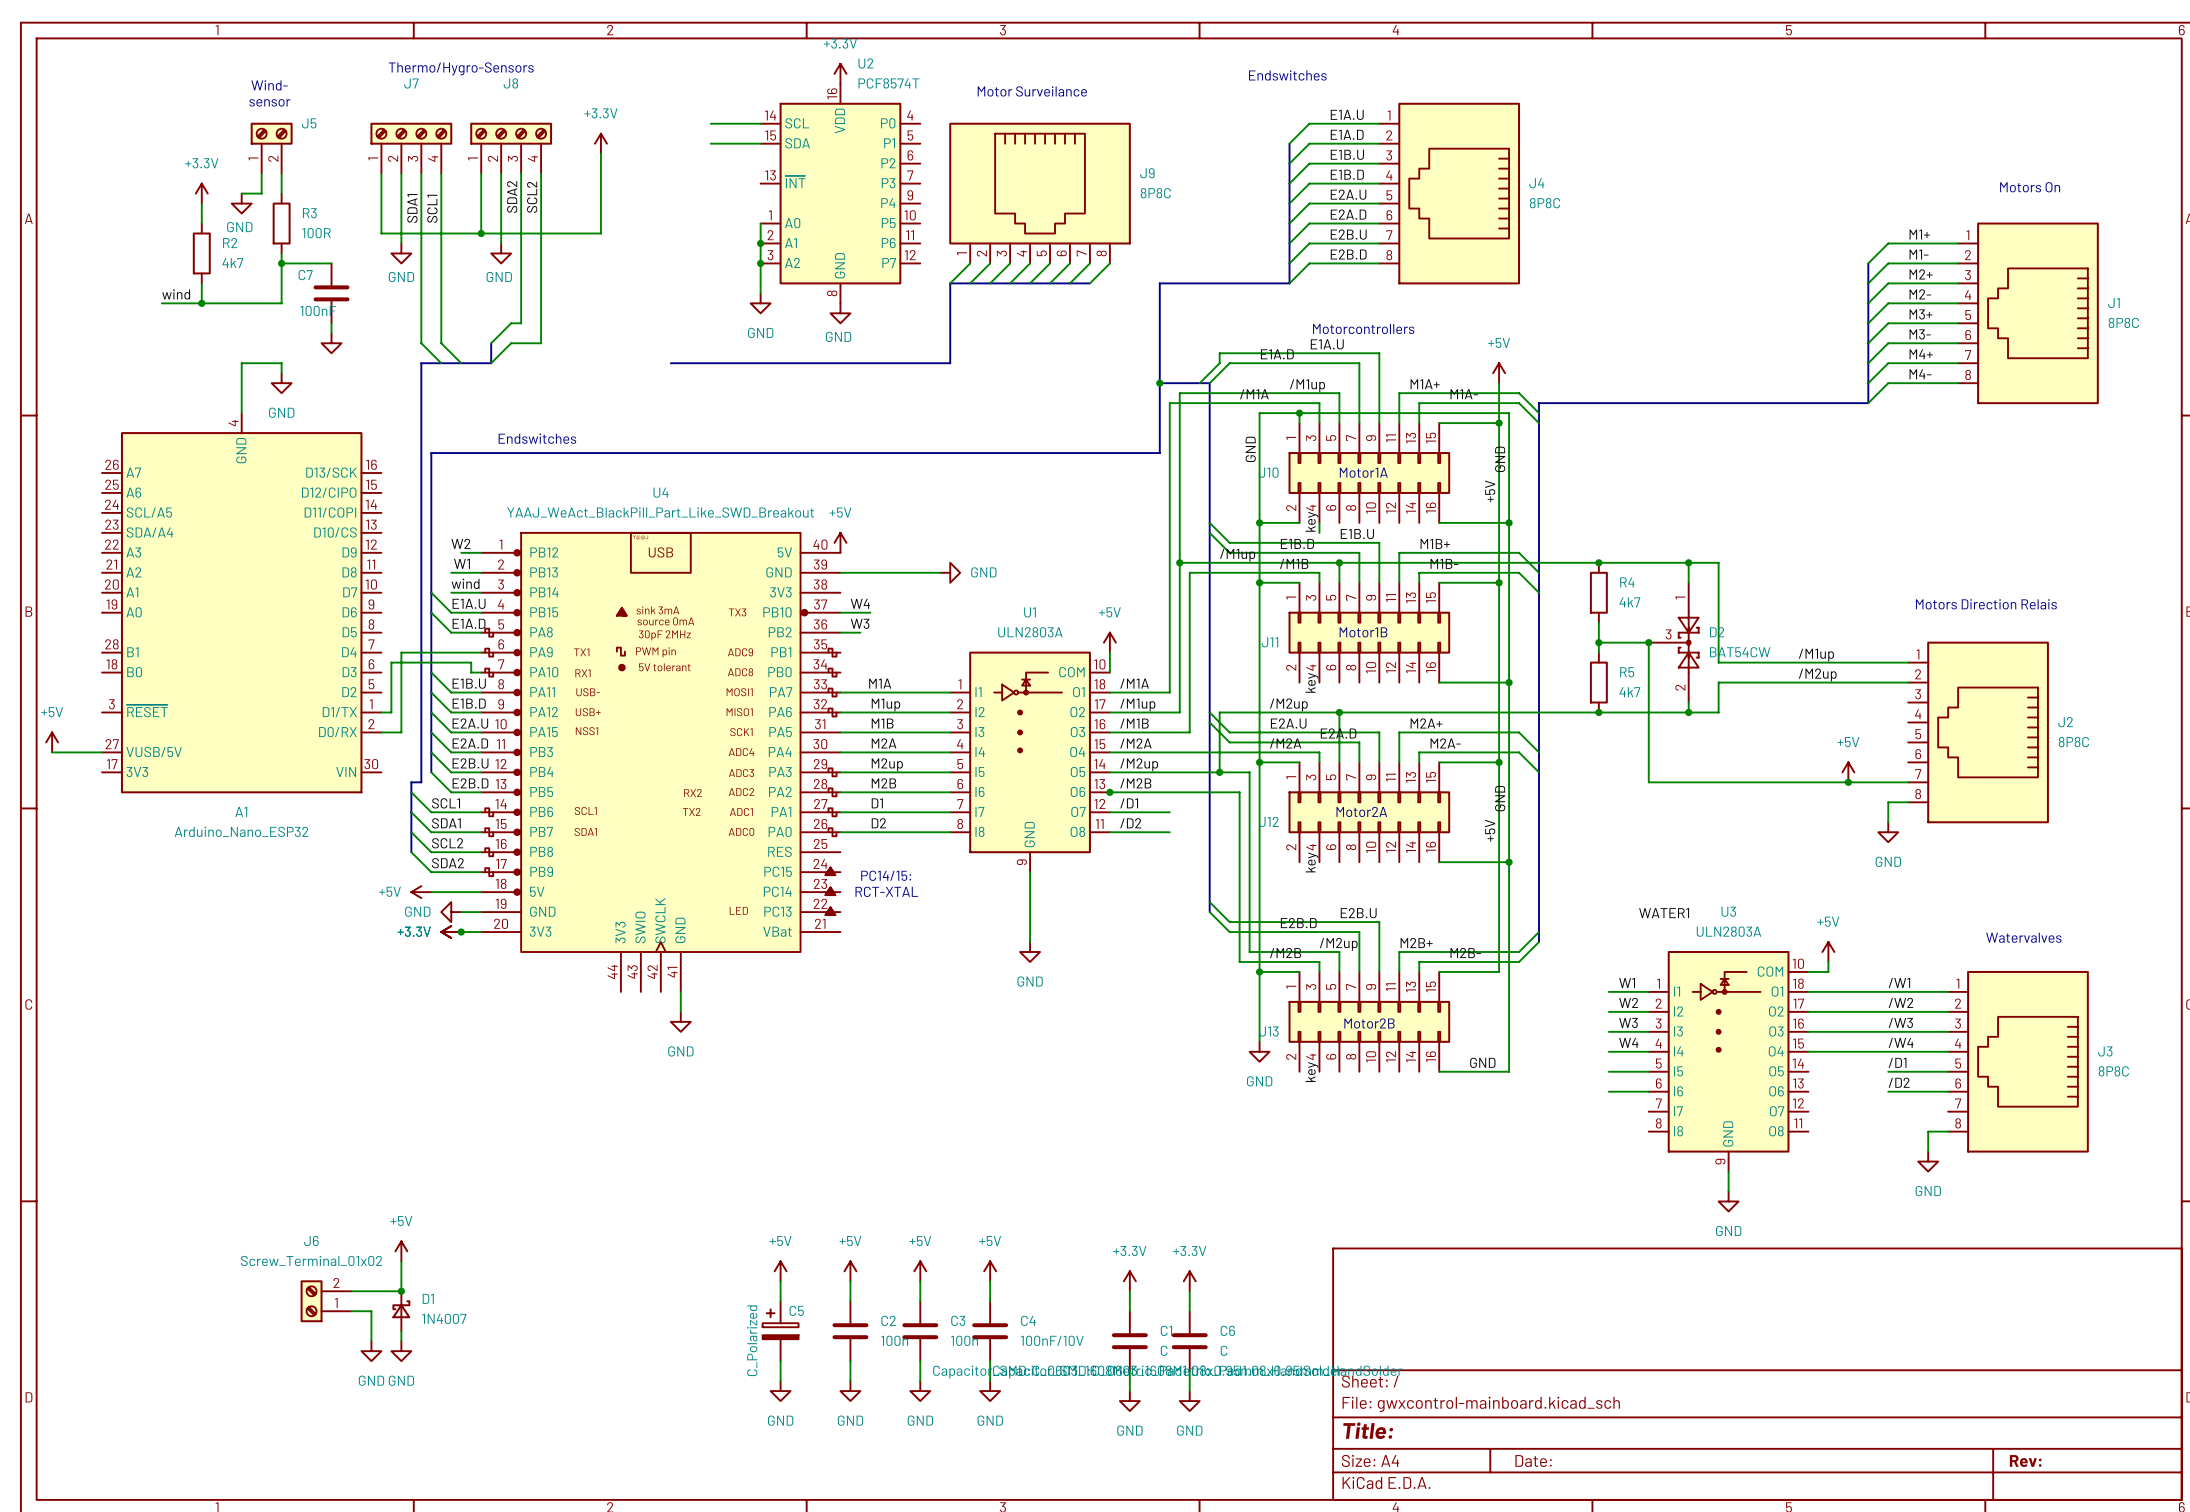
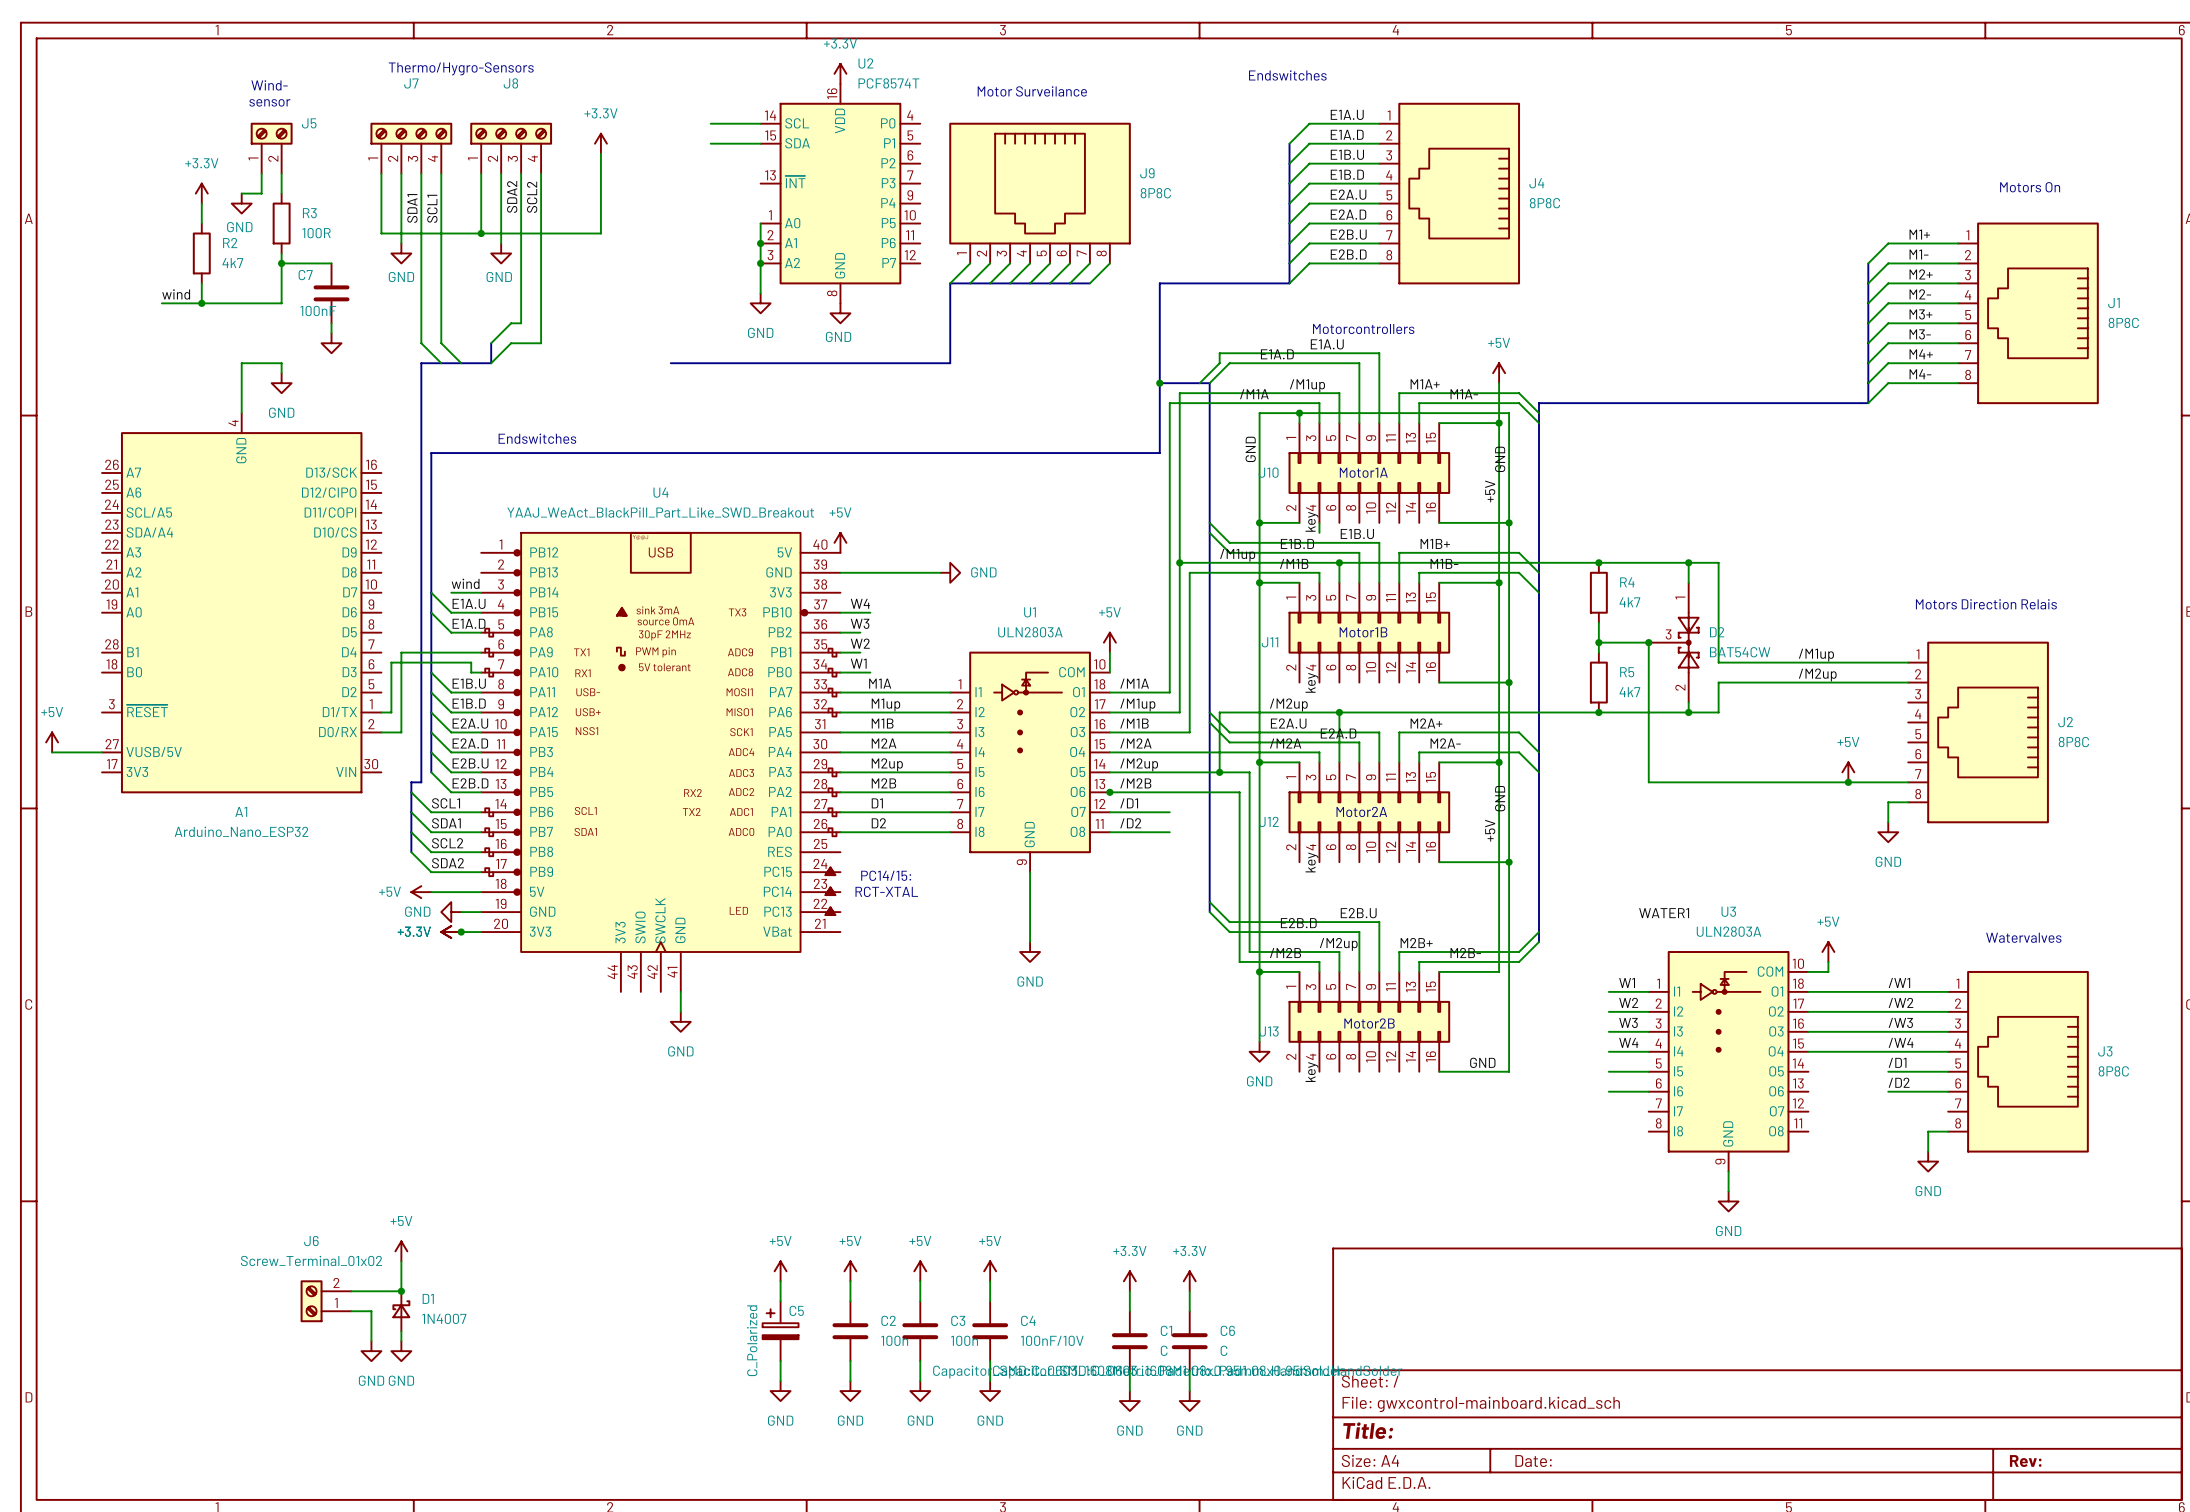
label: W2 (460, 543) -> none
wire: (461, 552) (481, 552) -> none
label: W1 (462, 563) -> none
wire: (451, 572) (481, 572) -> none
label: none -> W2 (860, 643)
wire: none -> (840, 652) (860, 652)
label: none -> W1 (858, 663)
wire: none -> (840, 672) (870, 672)

